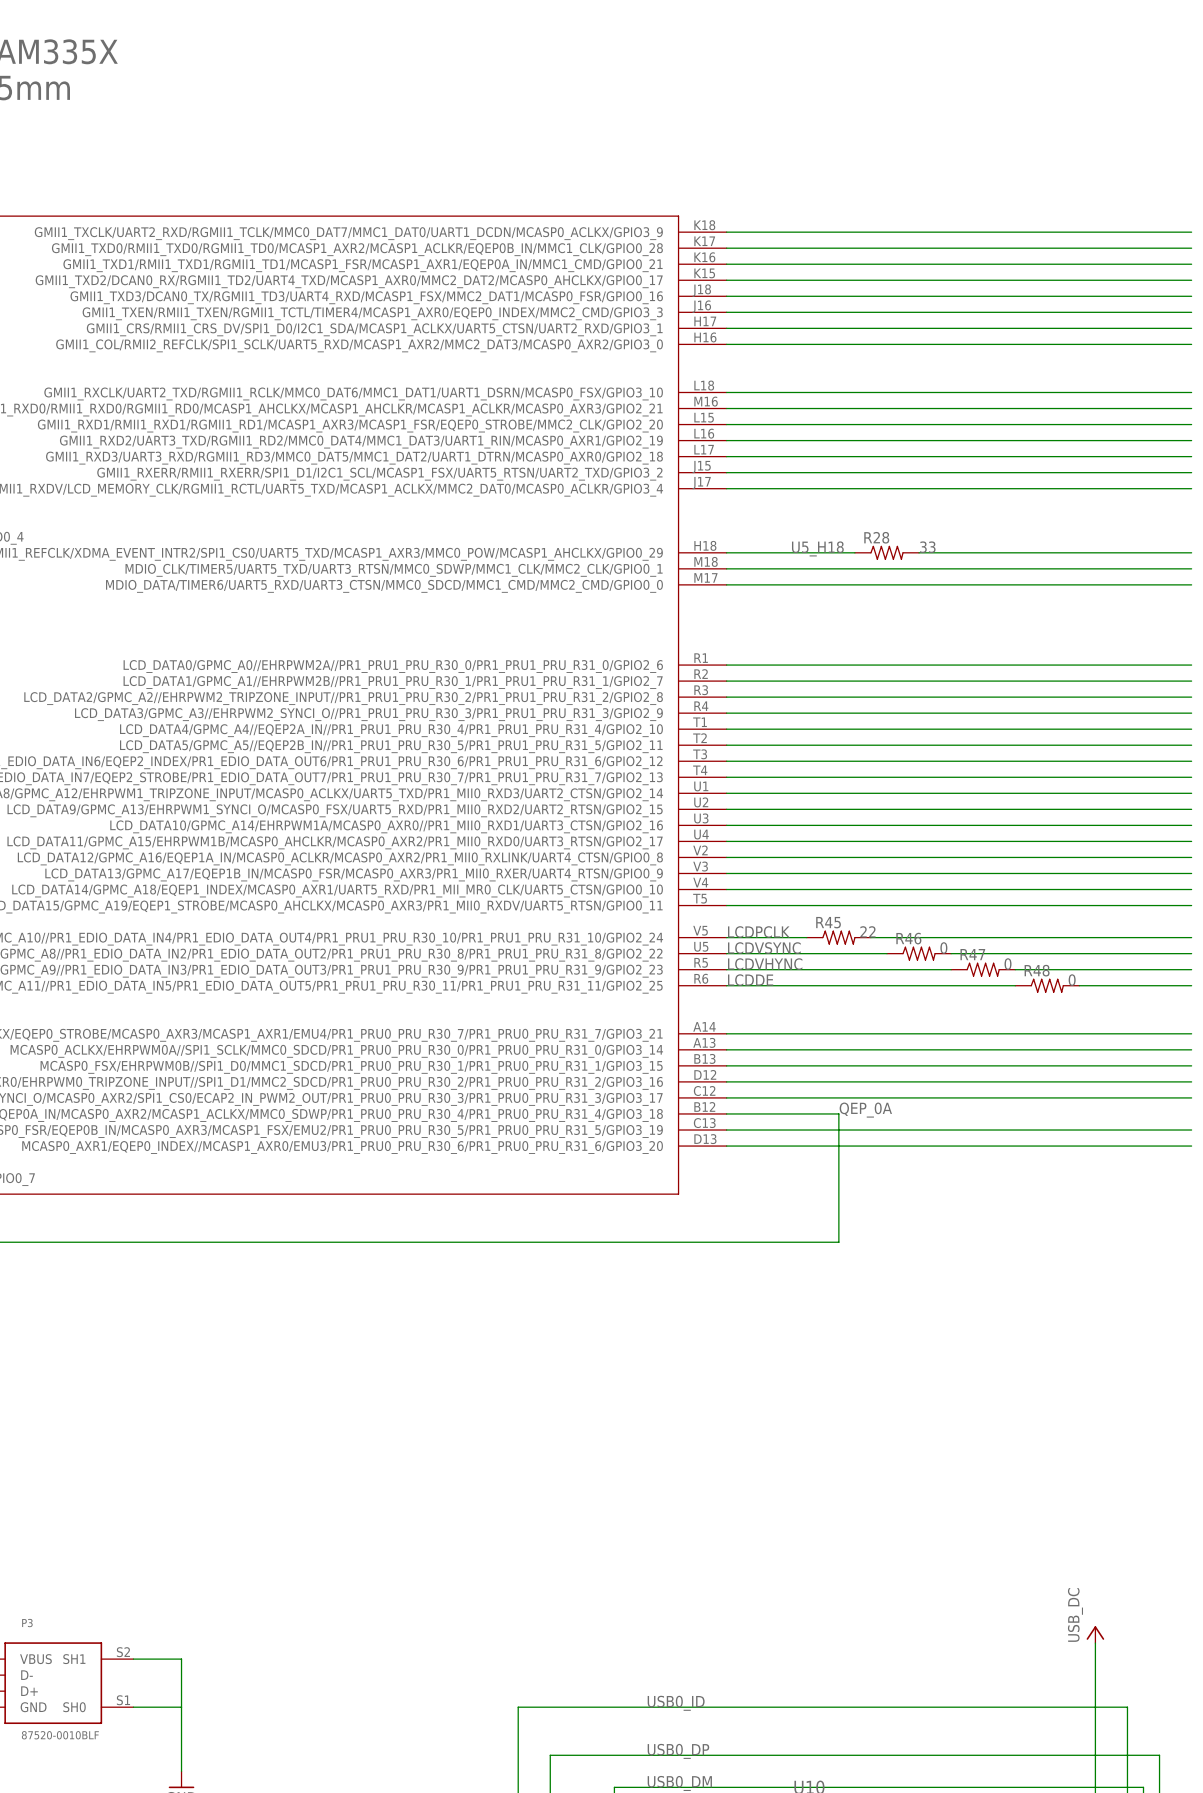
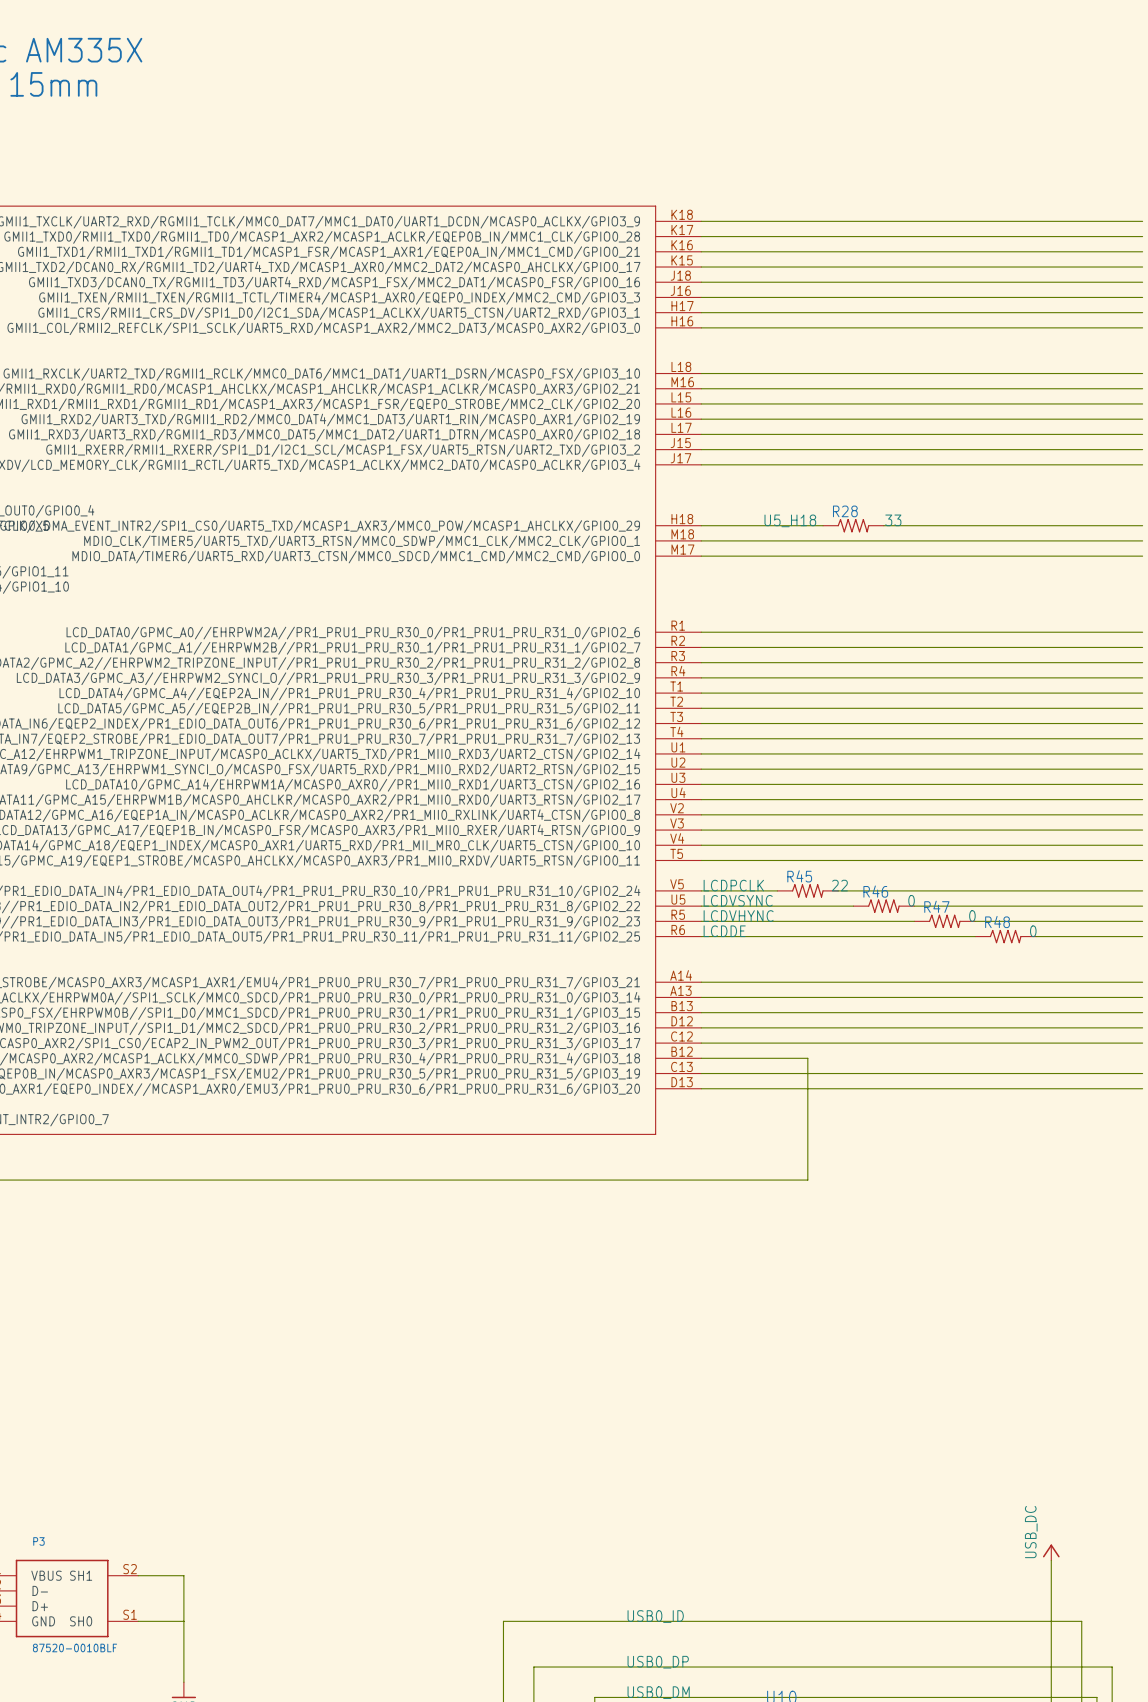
label: QEP_0A (865, 1110) -> none

